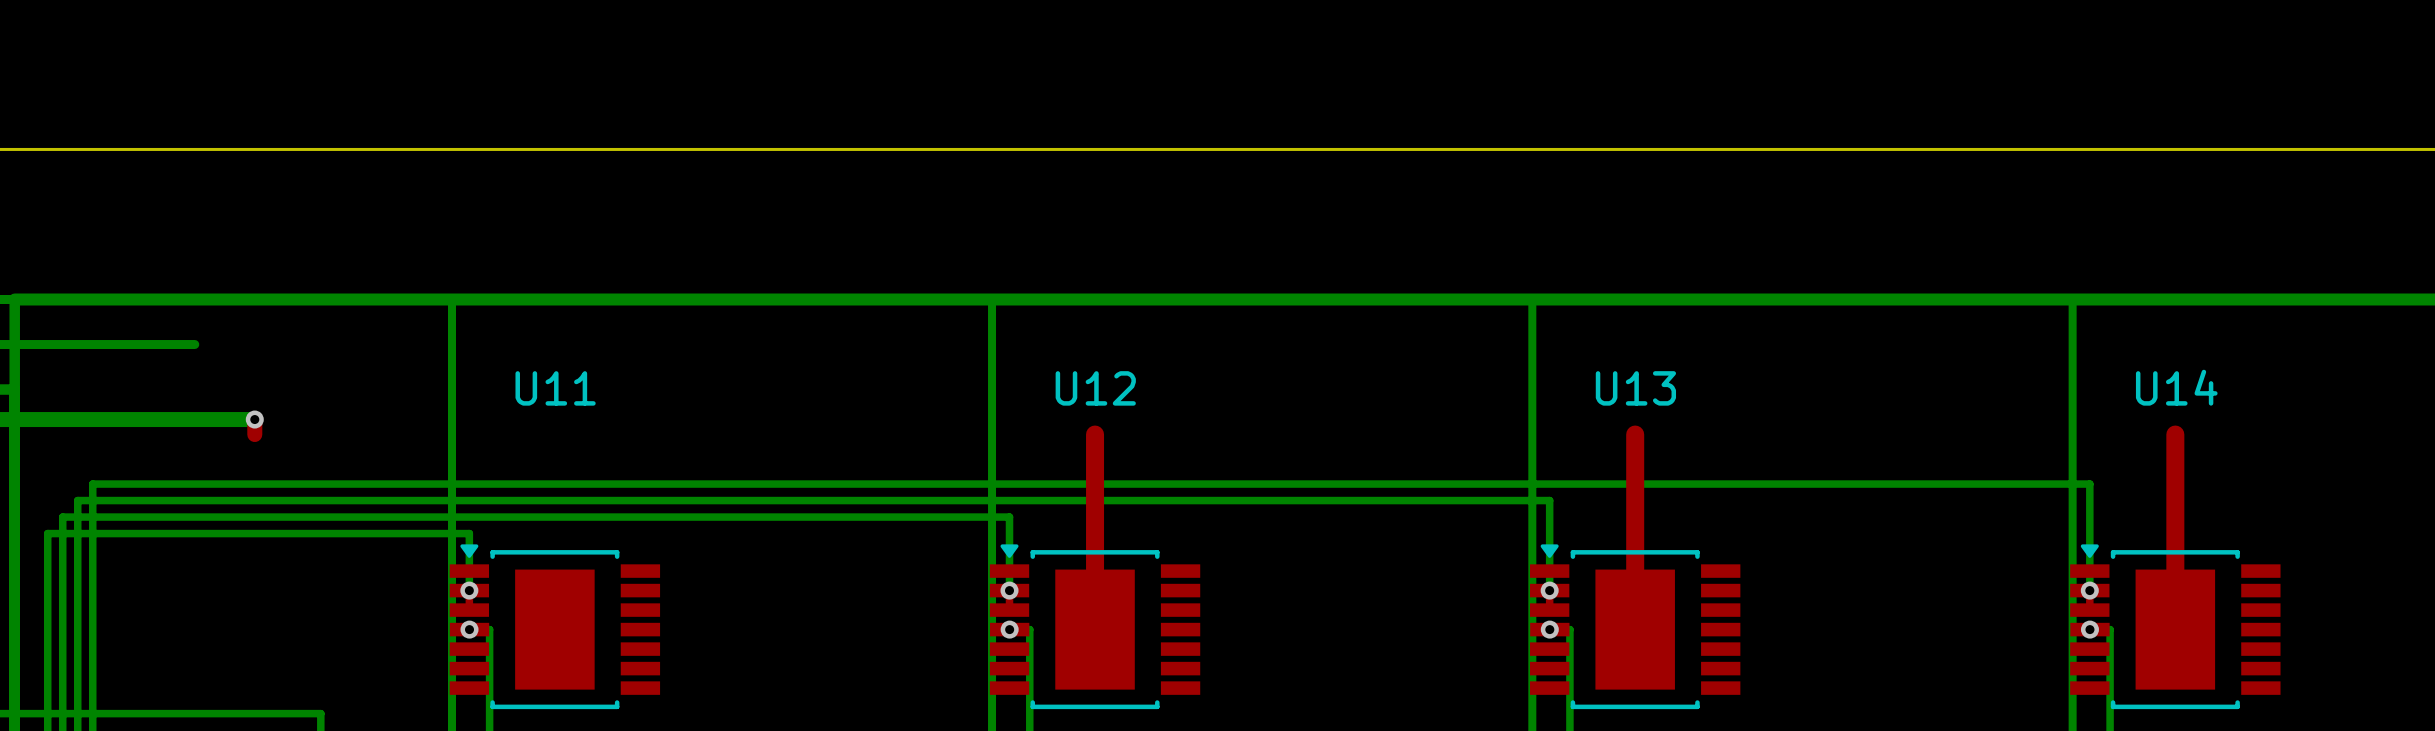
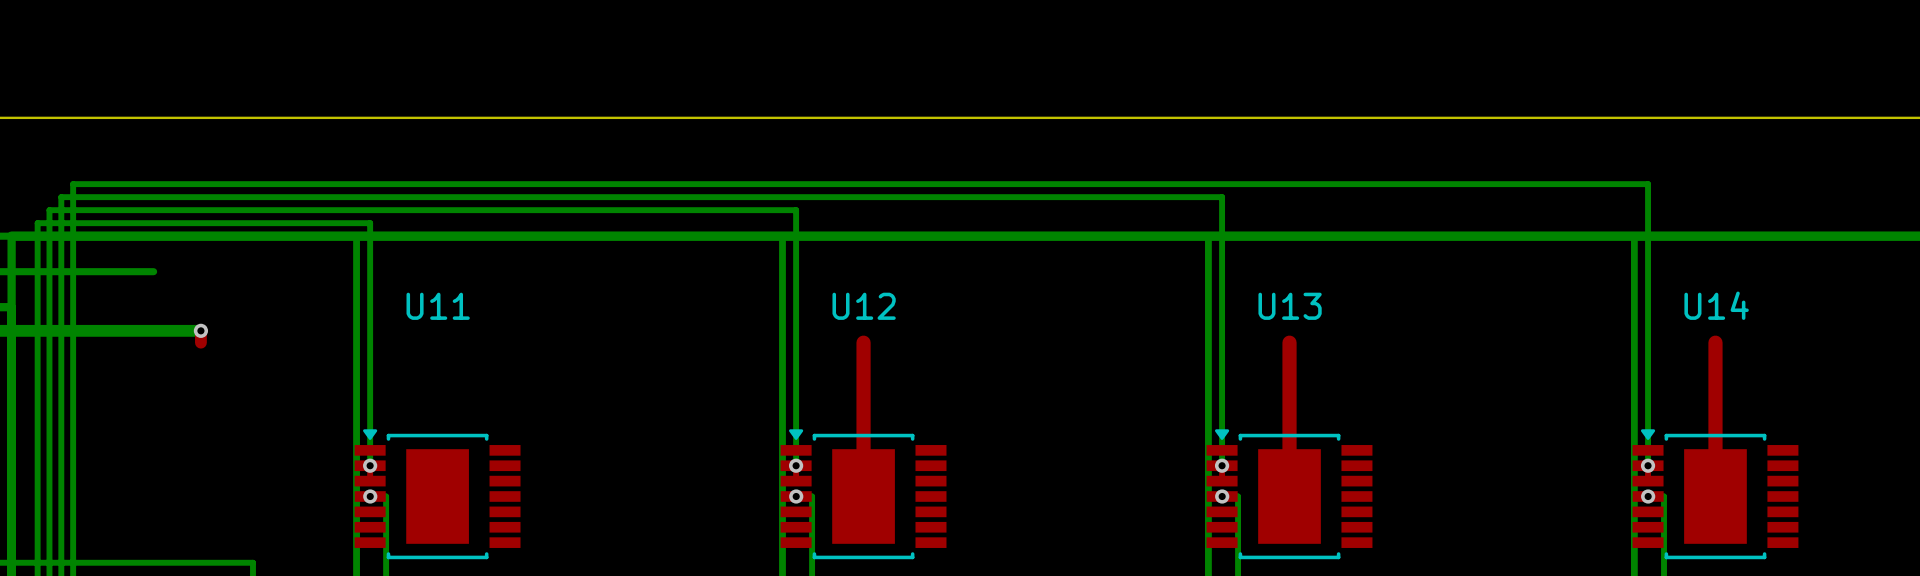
bottom track: (92, 484) (2089, 484) -> (73, 381) (73, 184) (1648, 184) (1648, 381)
bottom track: (77, 500) (1549, 500) -> (61, 394) (61, 197) (1222, 197) (1222, 394)
bottom track: (62, 517) (1009, 517) -> (49, 407) (49, 210) (796, 210) (796, 407)
bottom track: (47, 533) (469, 533) -> (37, 420) (37, 223) (370, 223) (370, 420)

